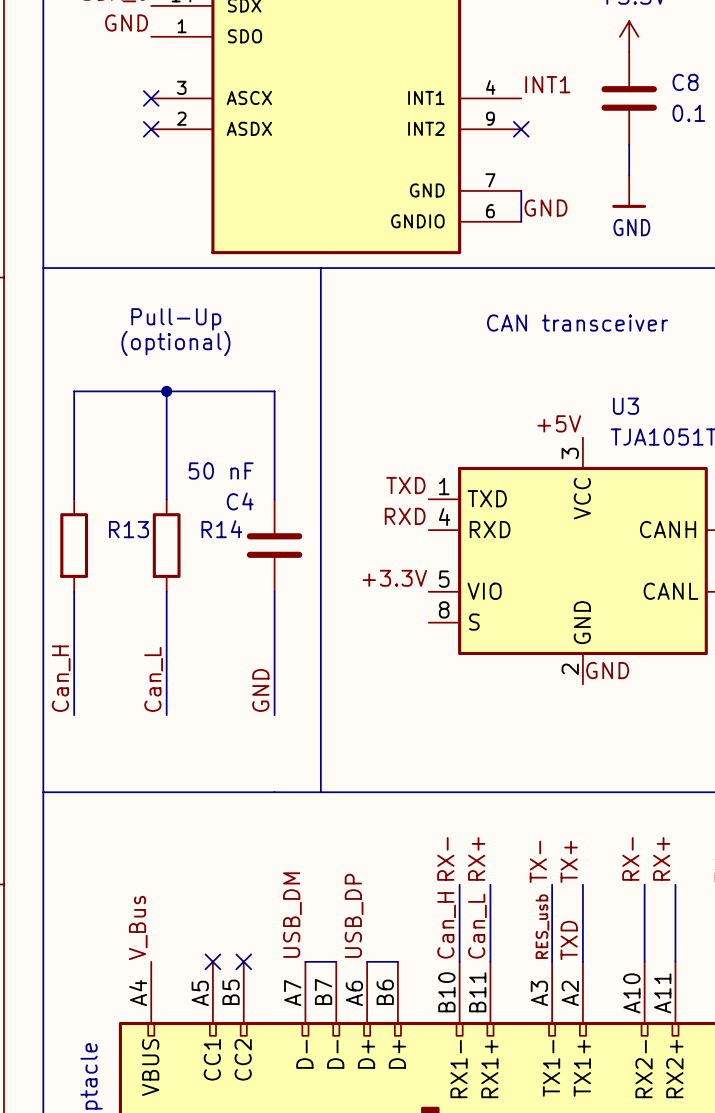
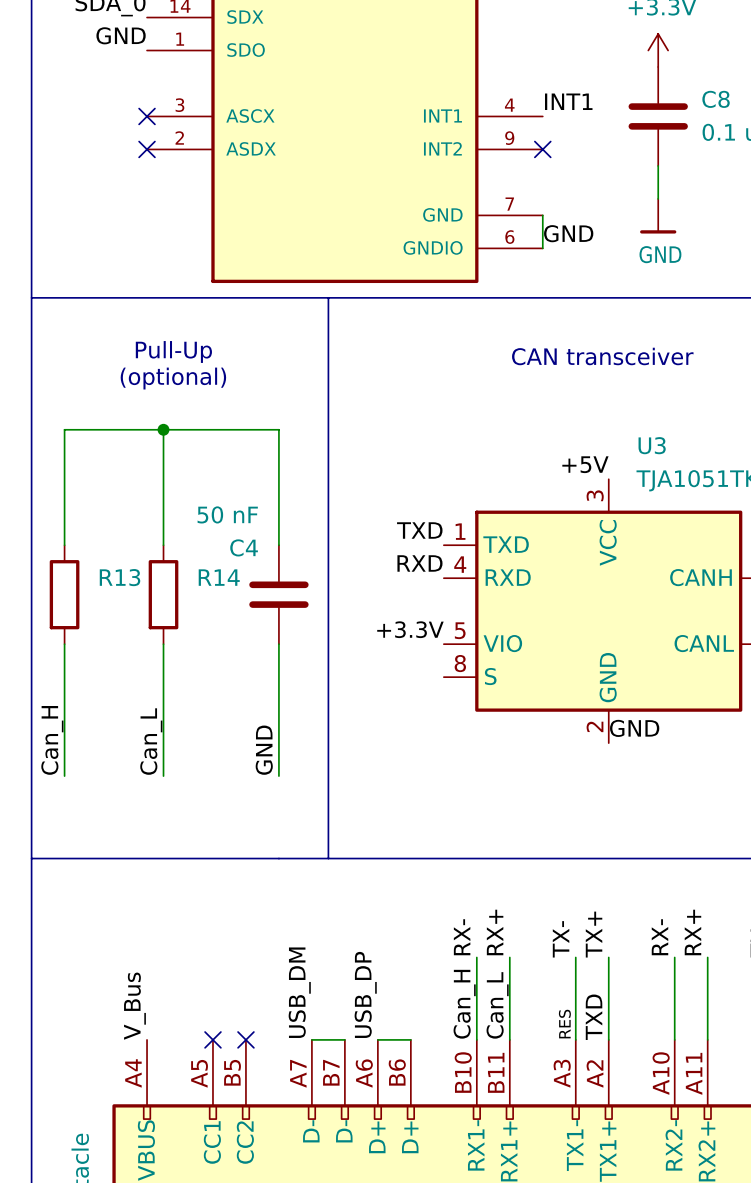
label: RES_usb (542, 926) -> RES (564, 1024)

